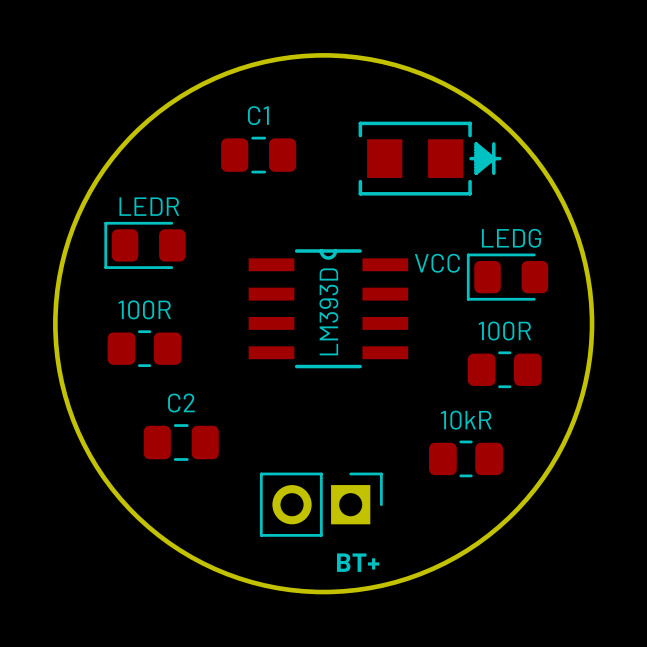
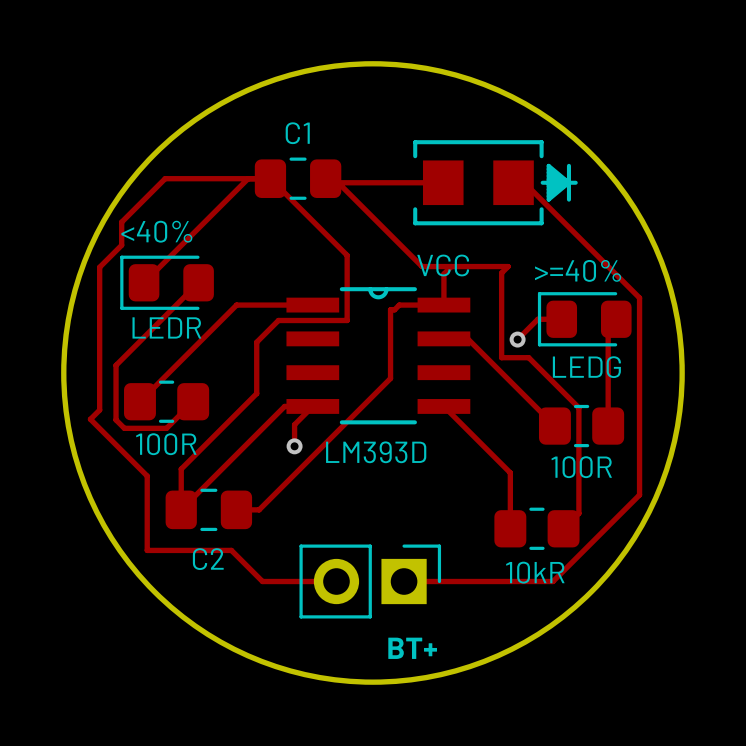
track: none -> (248, 178) (144, 282)
track: none -> (270, 178) (165, 178) (121, 222) (121, 245) (99, 267) (99, 410) (90, 419) (147, 476) (147, 550) (231, 550) (262, 581) (336, 581)
track: none -> (270, 178) (347, 255) (347, 320) (278, 320) (256, 342) (256, 393) (181, 469) (181, 509) (284, 406) (312, 406) (294, 424) (294, 446)
track: none -> (325, 178) (329, 182) (443, 182)
track: none -> (325, 178) (334, 178) (422, 266) (508, 266) (501, 273) (501, 357) (528, 357) (578, 407) (578, 513) (563, 528)
track: none -> (513, 182) (524, 182) (639, 297) (639, 494) (553, 581) (404, 581)
text: none -> <40% (156, 231)
LEDR name position: LEDR (149, 206) -> LEDR (166, 327)
track: none -> (451, 266) (443, 273) (443, 305) (399, 305) (394, 309) (390, 309) (390, 378) (259, 509) (236, 509)
text: none -> >=40% (578, 270)
LEDG name position: LEDG (511, 238) -> LEDG (586, 367)
track: none -> (198, 282) (116, 365) (116, 419) (124, 428) (166, 428) (193, 401)
text position: VCC (437, 263) -> VCC (443, 265)
track: none -> (312, 305) (236, 305) (139, 401)
track: none -> (616, 319) (608, 327) (608, 426)
track: none -> (561, 330) (561, 319) (537, 319) (517, 339)
track: none -> (443, 338) (467, 338) (554, 426)
via: none -> (517, 339)
100R name position: 100R (144, 309) -> 100R (166, 444)
part value rotation: 0° (328, 311) -> 90° clockwise (376, 452)
100R name position: 100R (504, 330) -> 100R (581, 467)
track: none -> (443, 406) (510, 472) (510, 528)
via: none -> (294, 446)
C2 name position: C2 (181, 403) -> C2 (208, 559)
10kR name position: 10kR (466, 420) -> 10kR (535, 572)

